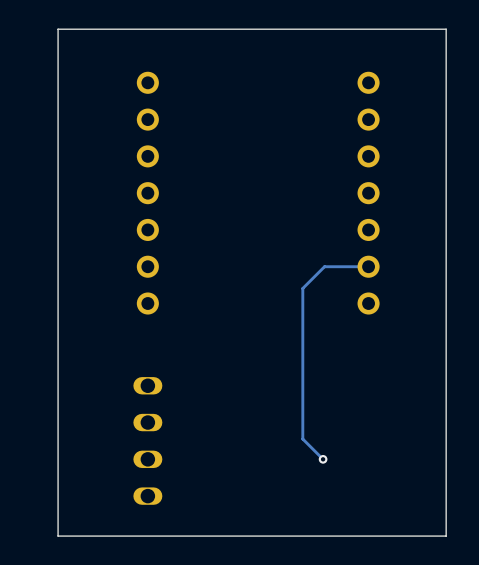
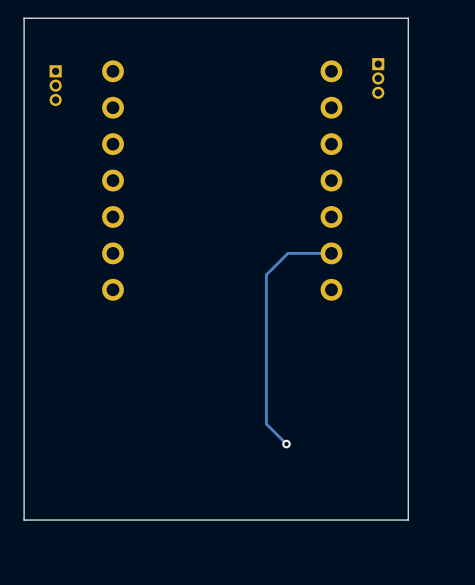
part: none -> (378, 78)
part: none -> (55, 85)
part: (147, 440) -> none

